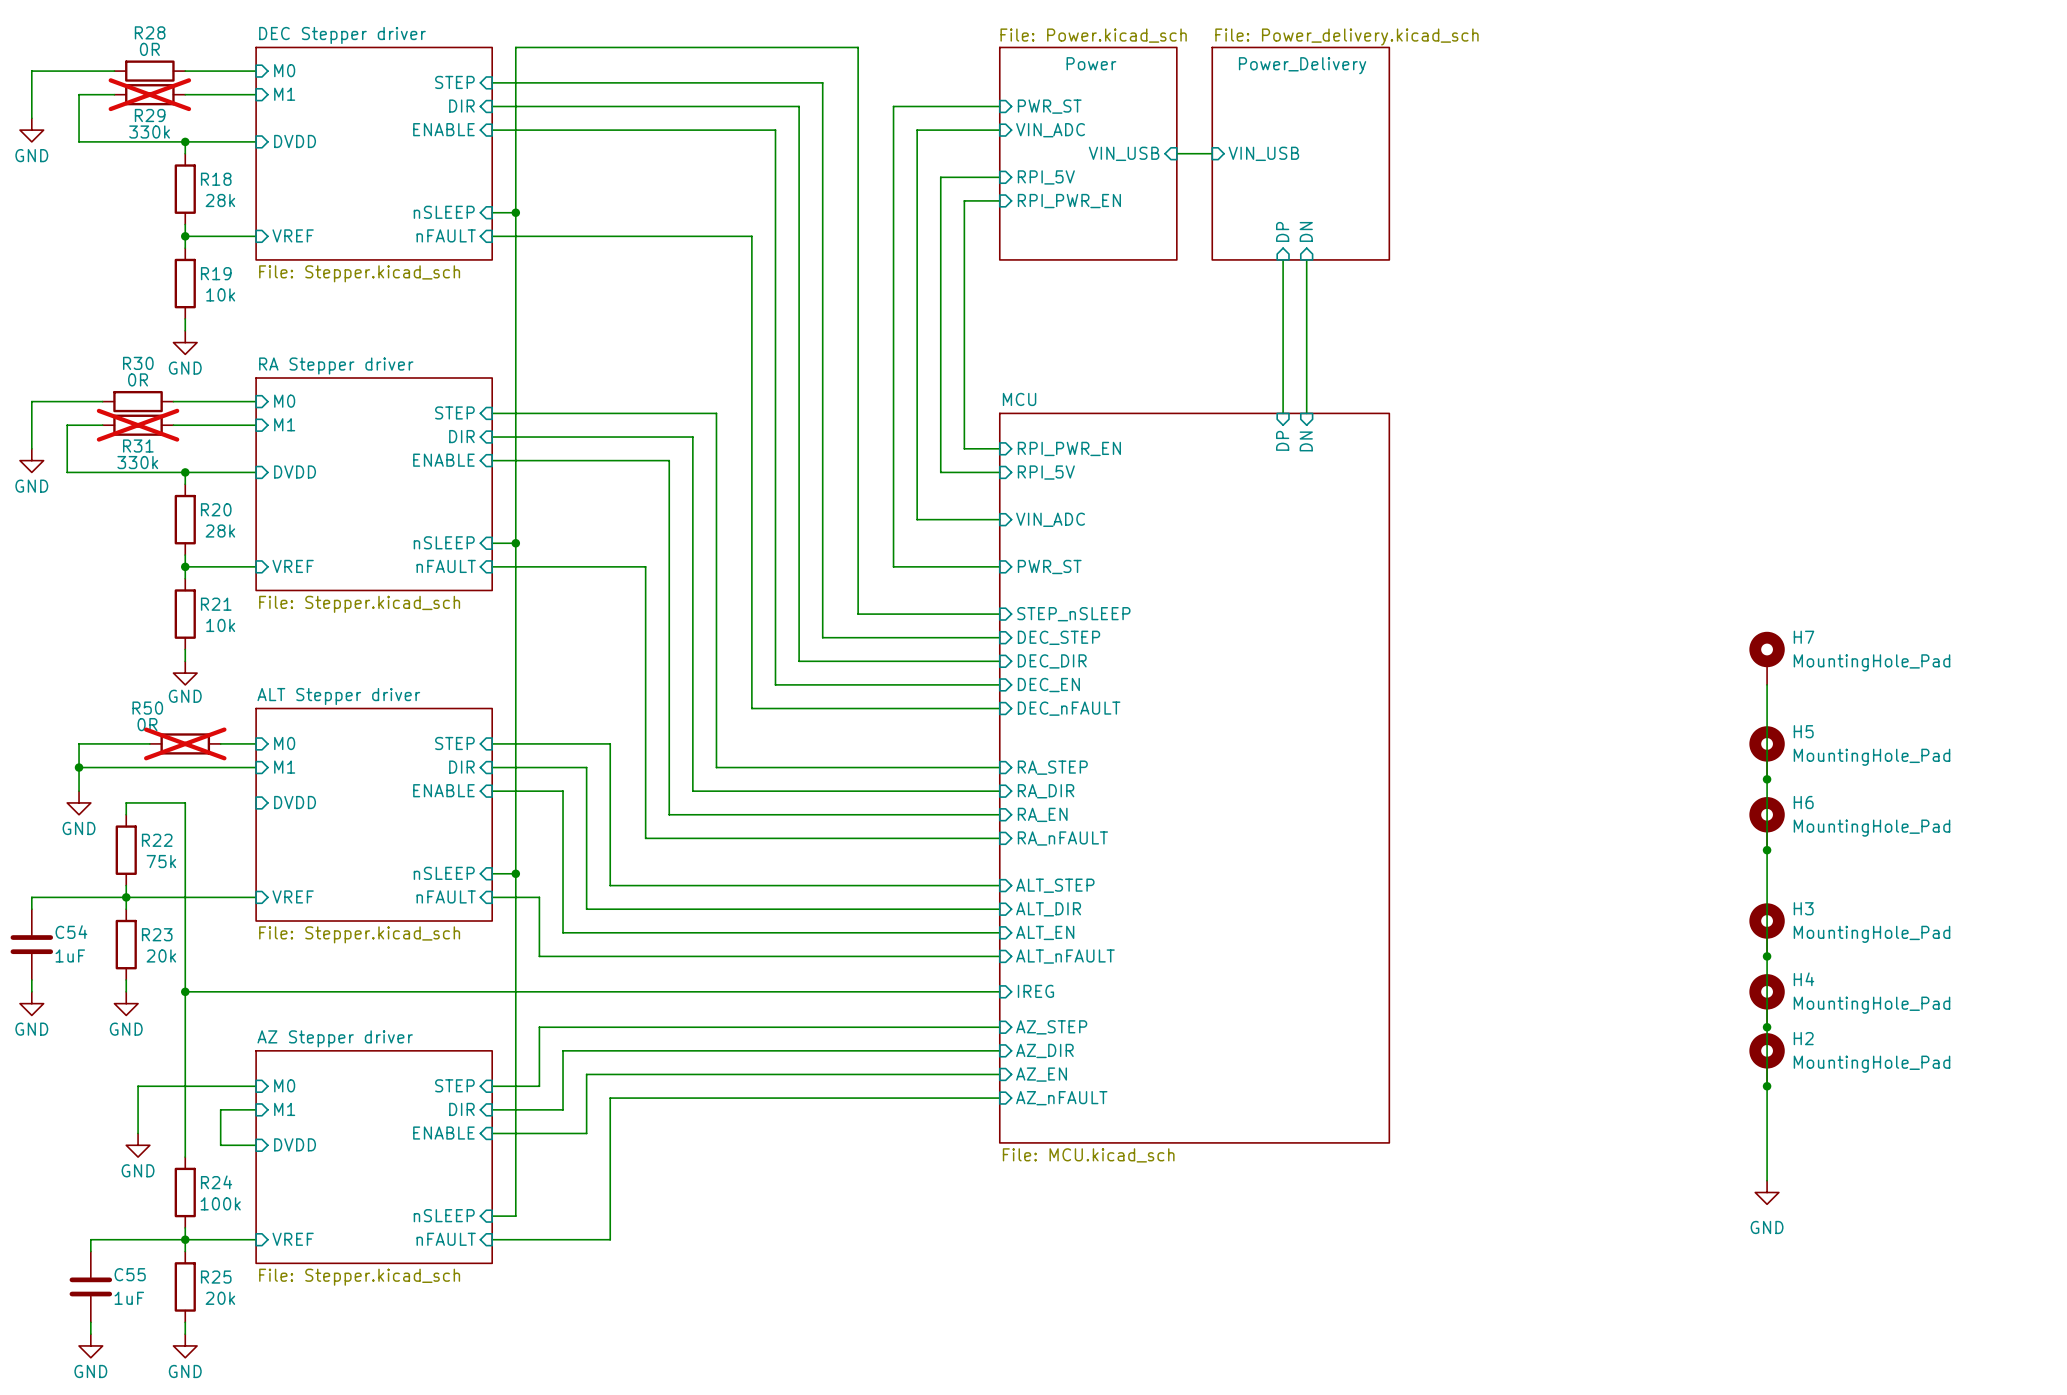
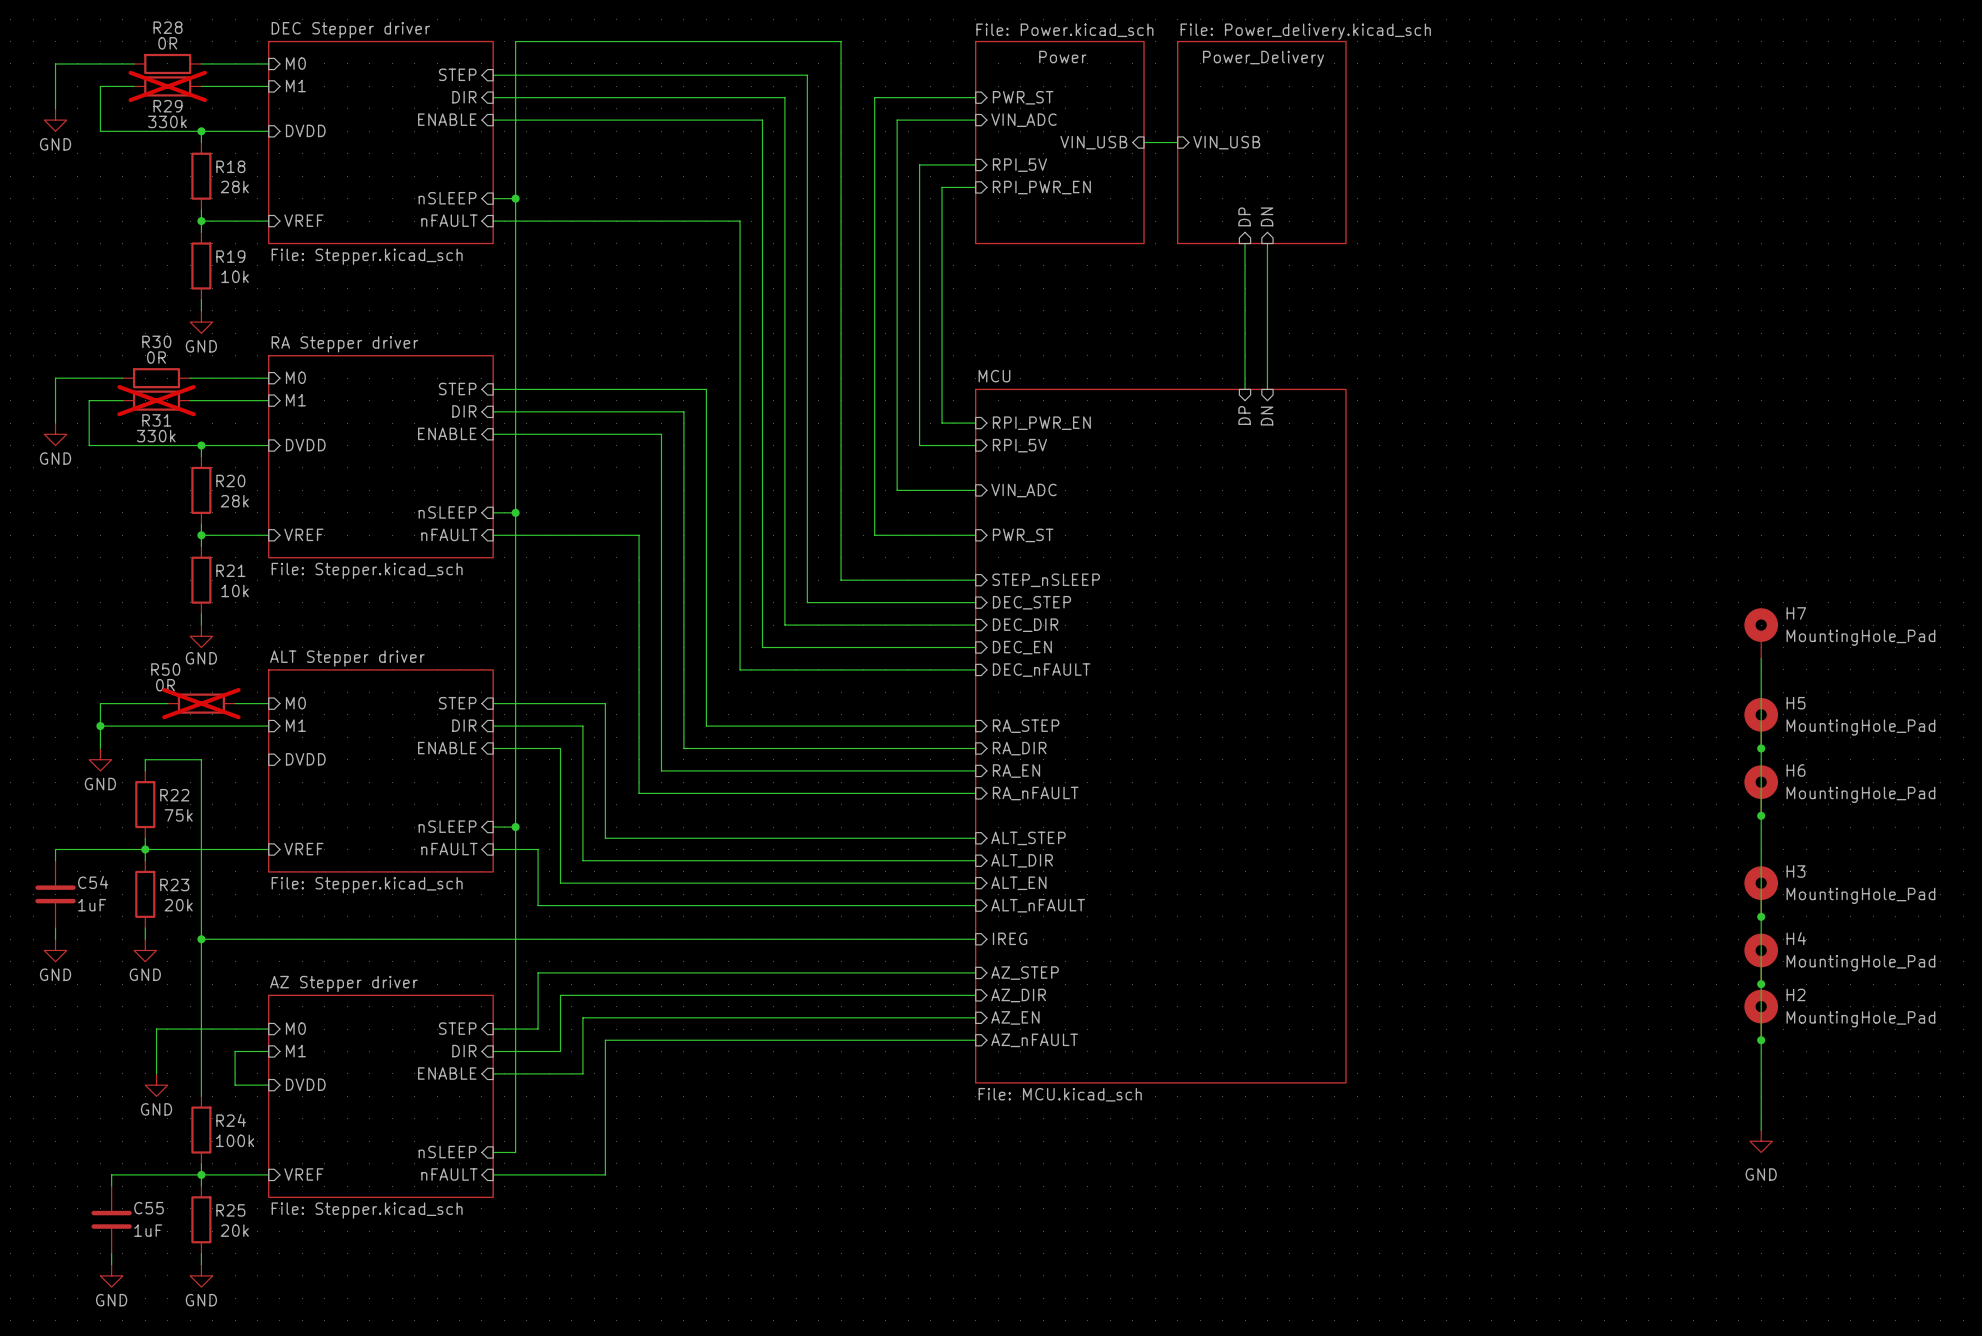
H7 position: (1767, 658) -> (1761, 633)
wire: (1767, 684) (1767, 1180) -> (1761, 658) (1761, 1130)
H5 position: (1767, 752) -> (1761, 723)
junction: (1767, 779) -> none
junction: none -> (1761, 748)
H6 position: (1767, 823) -> (1761, 790)
junction: (1767, 850) -> none
junction: none -> (1761, 815)
H3 position: (1767, 929) -> (1761, 891)
junction: (1767, 956) -> none
junction: none -> (1761, 916)
H4 position: (1767, 1000) -> (1761, 958)
junction: (1767, 1027) -> none
junction: none -> (1761, 984)
H2 position: (1767, 1059) -> (1761, 1015)
junction: (1767, 1086) -> none
junction: none -> (1761, 1040)
power symbol position: GND (1767, 1192) -> GND (1761, 1141)

